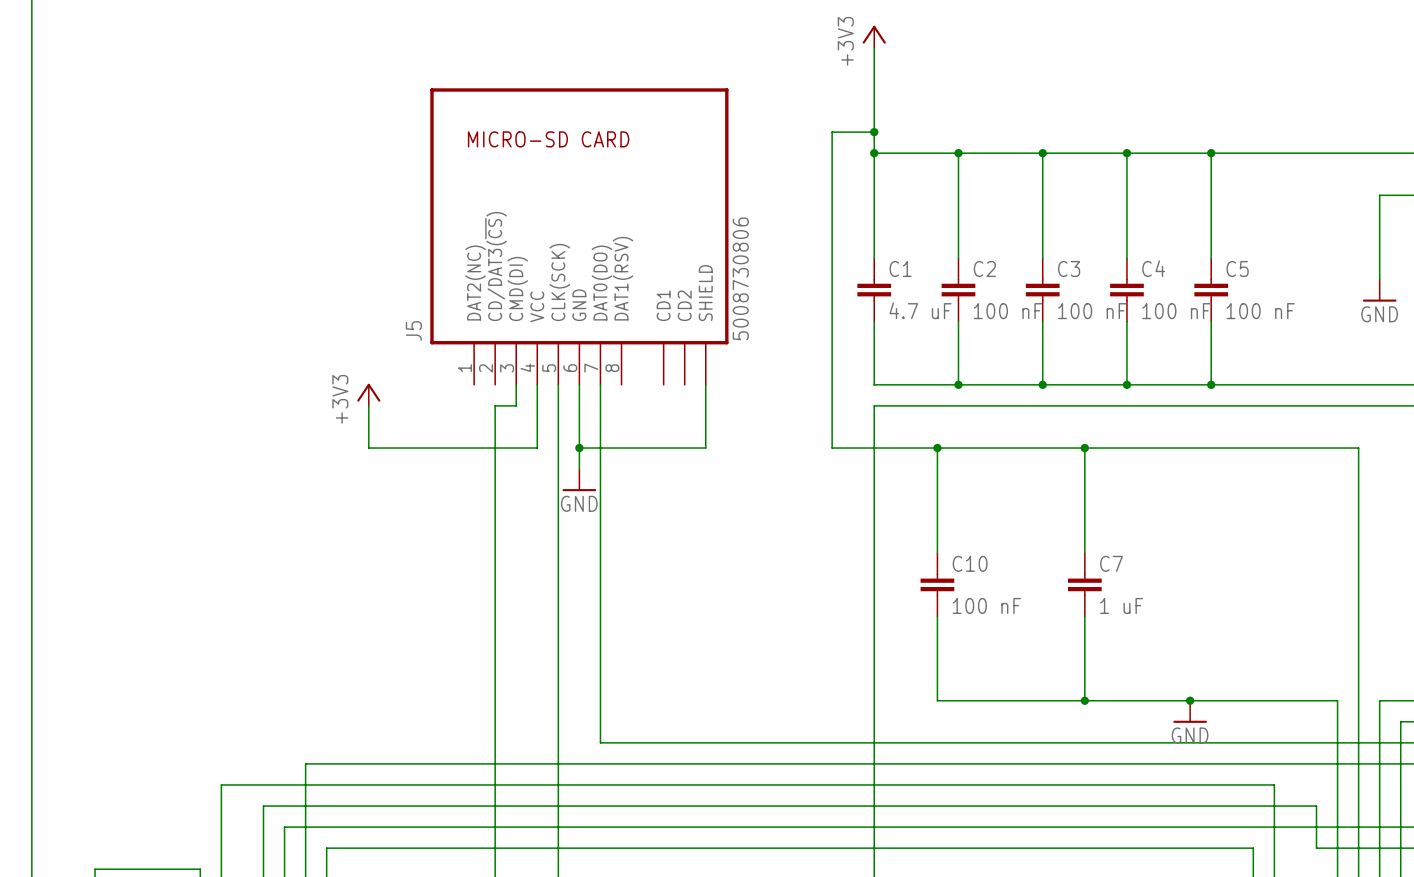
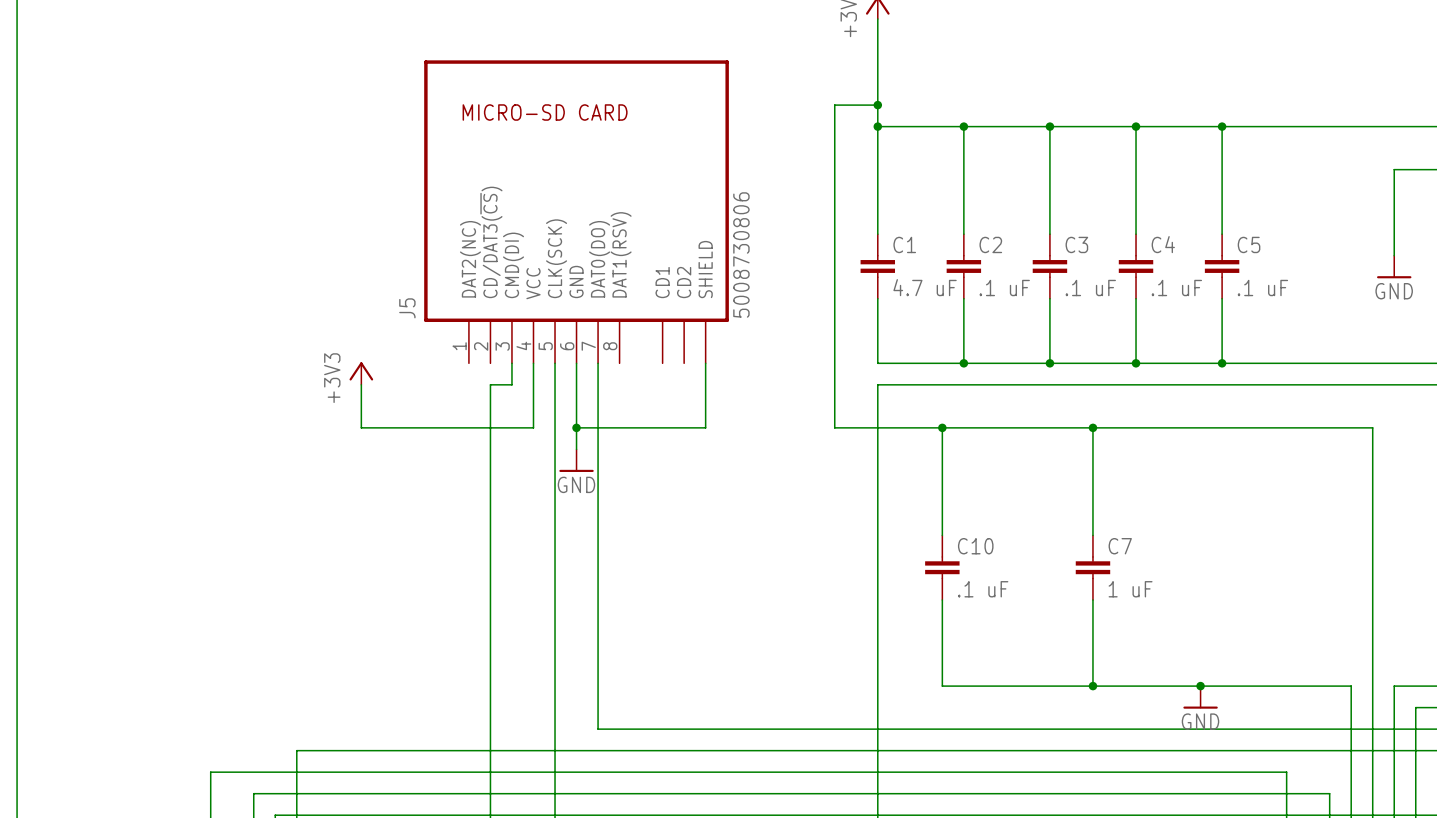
C2 value: 100 nF (1007, 311) -> .1 uF (1004, 288)
C3 value: 100 nF (1092, 311) -> .1 uF (1090, 288)
C4 value: 100 nF (1176, 311) -> .1 uF (1176, 288)
C5 value: 100 nF (1260, 311) -> .1 uF (1262, 288)
C10 value: 100 nF (986, 605) -> .1 uF (983, 589)

